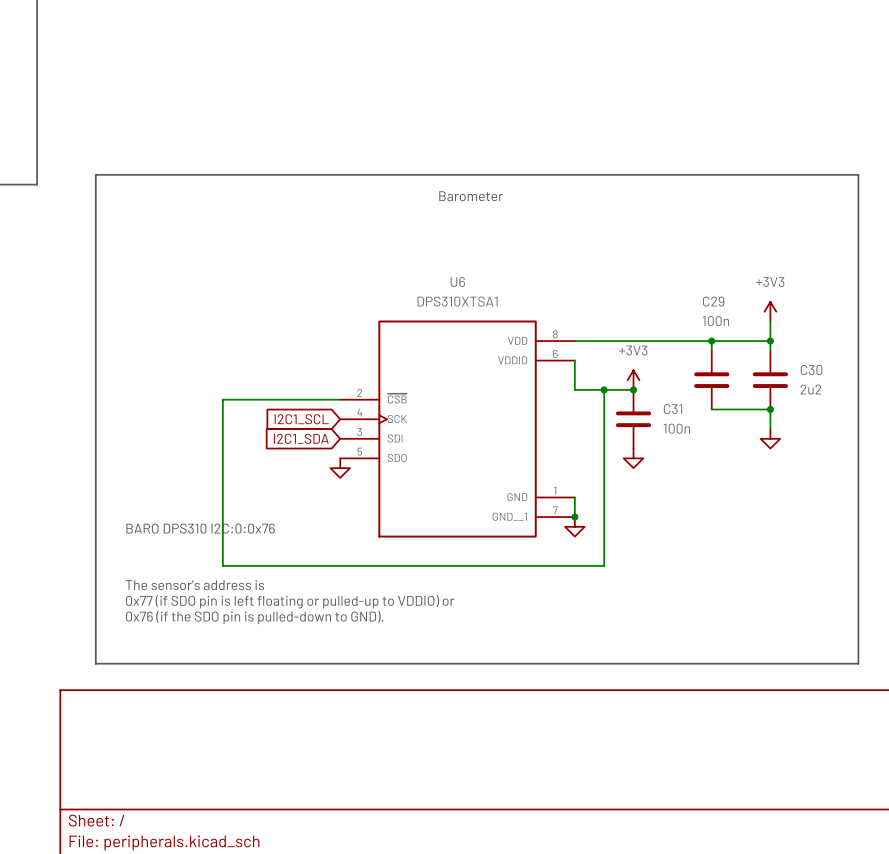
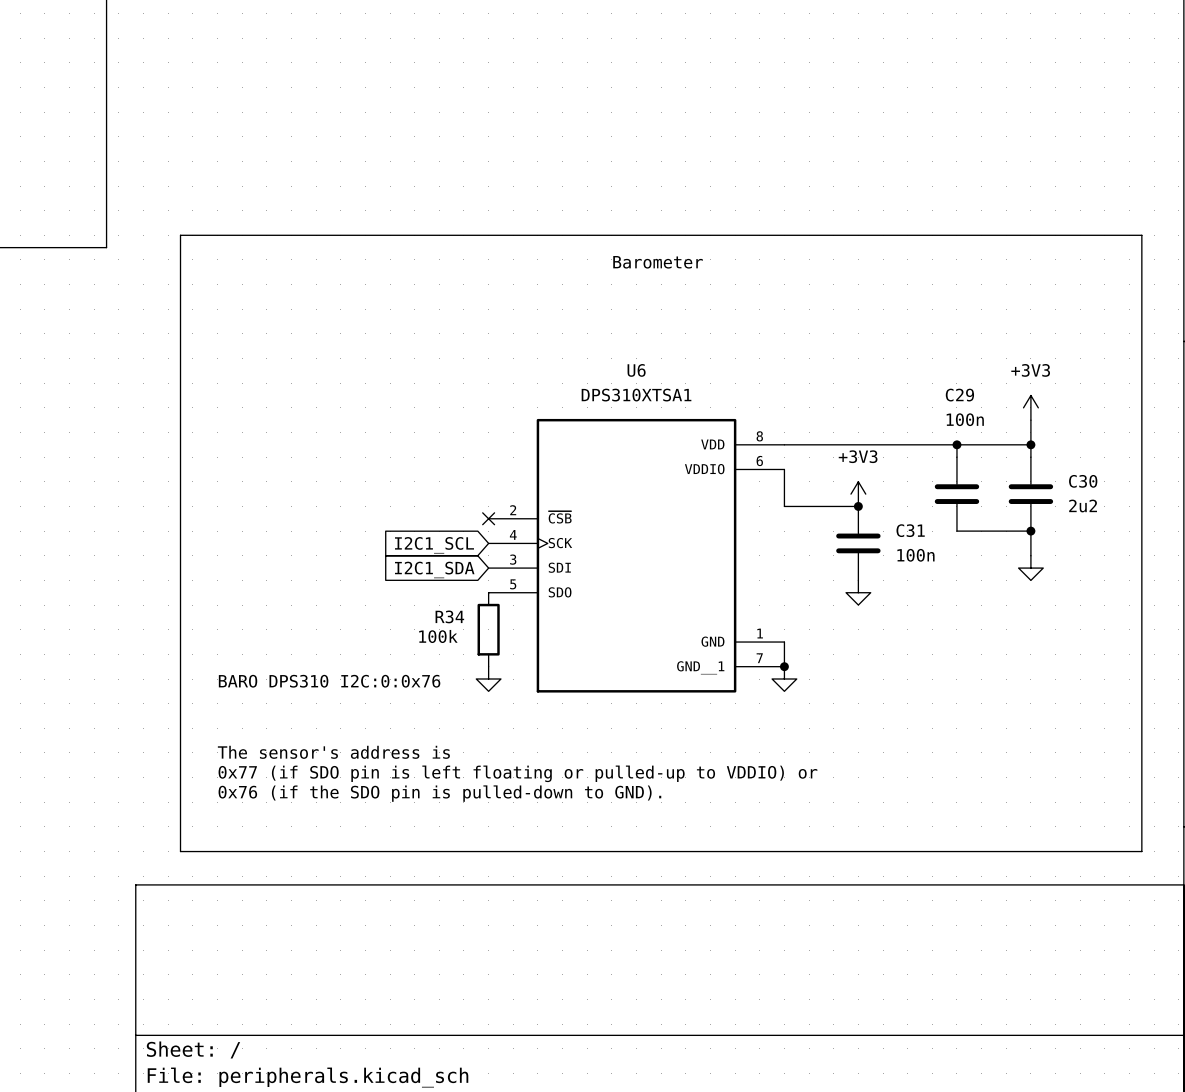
wire: (604, 389) (604, 565) (222, 565) (222, 399) (340, 399) -> none
junction: (604, 389) -> none
no-connect mark: none -> (488, 518)
power symbol position: (340, 468) -> (488, 679)
R34: none -> 100k (488, 629)

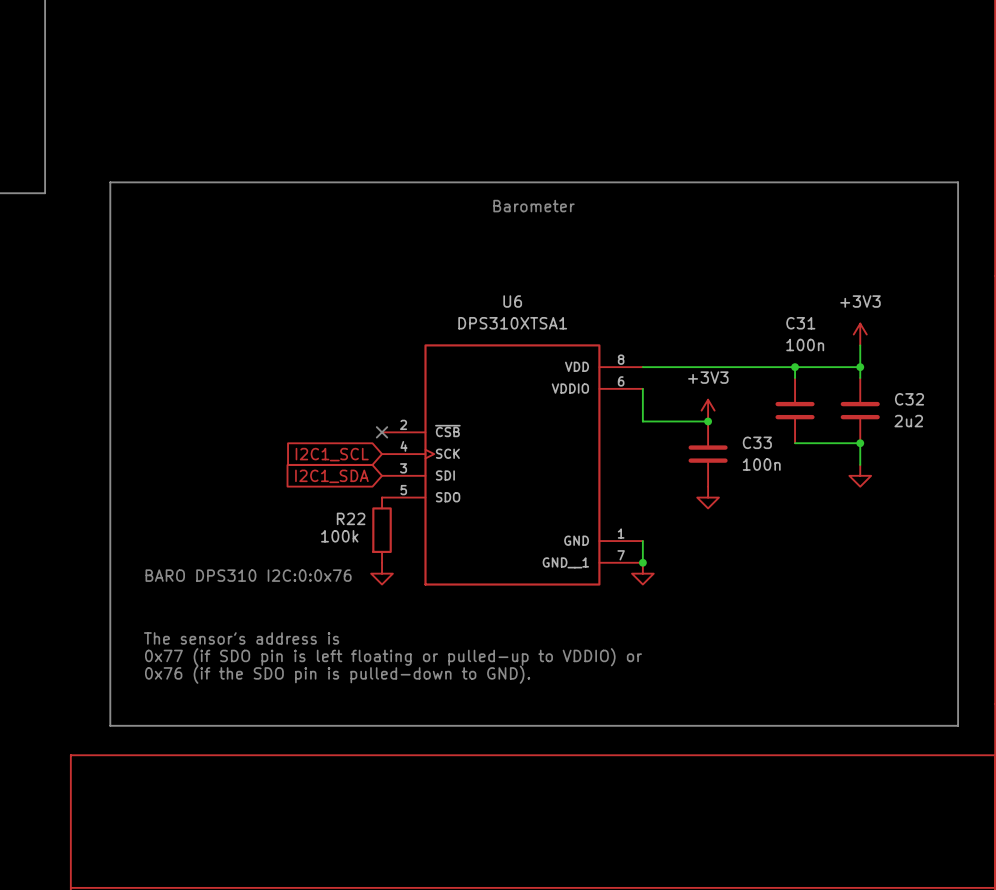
C29 name: C29 (959, 395) -> C31 (800, 323)
C30 name: C30 (1083, 481) -> C32 (909, 399)
C31 name: C31 (910, 530) -> C33 (757, 442)
R34 name: R34 (449, 616) -> R22 (351, 518)

